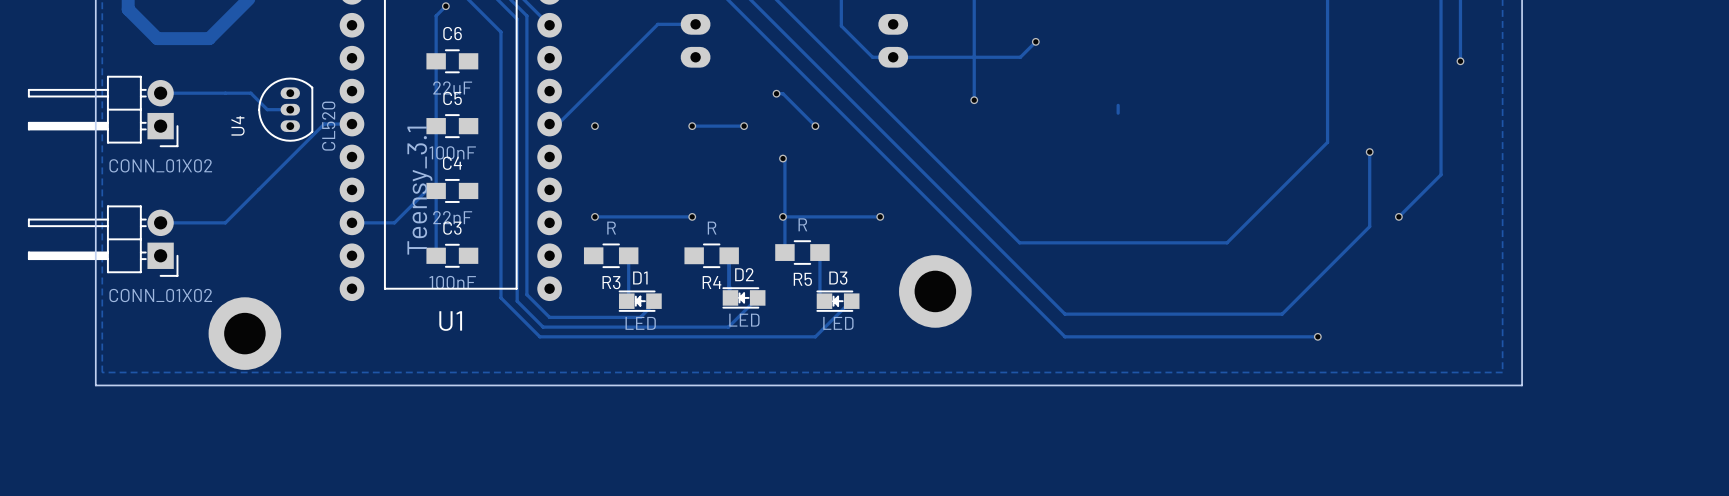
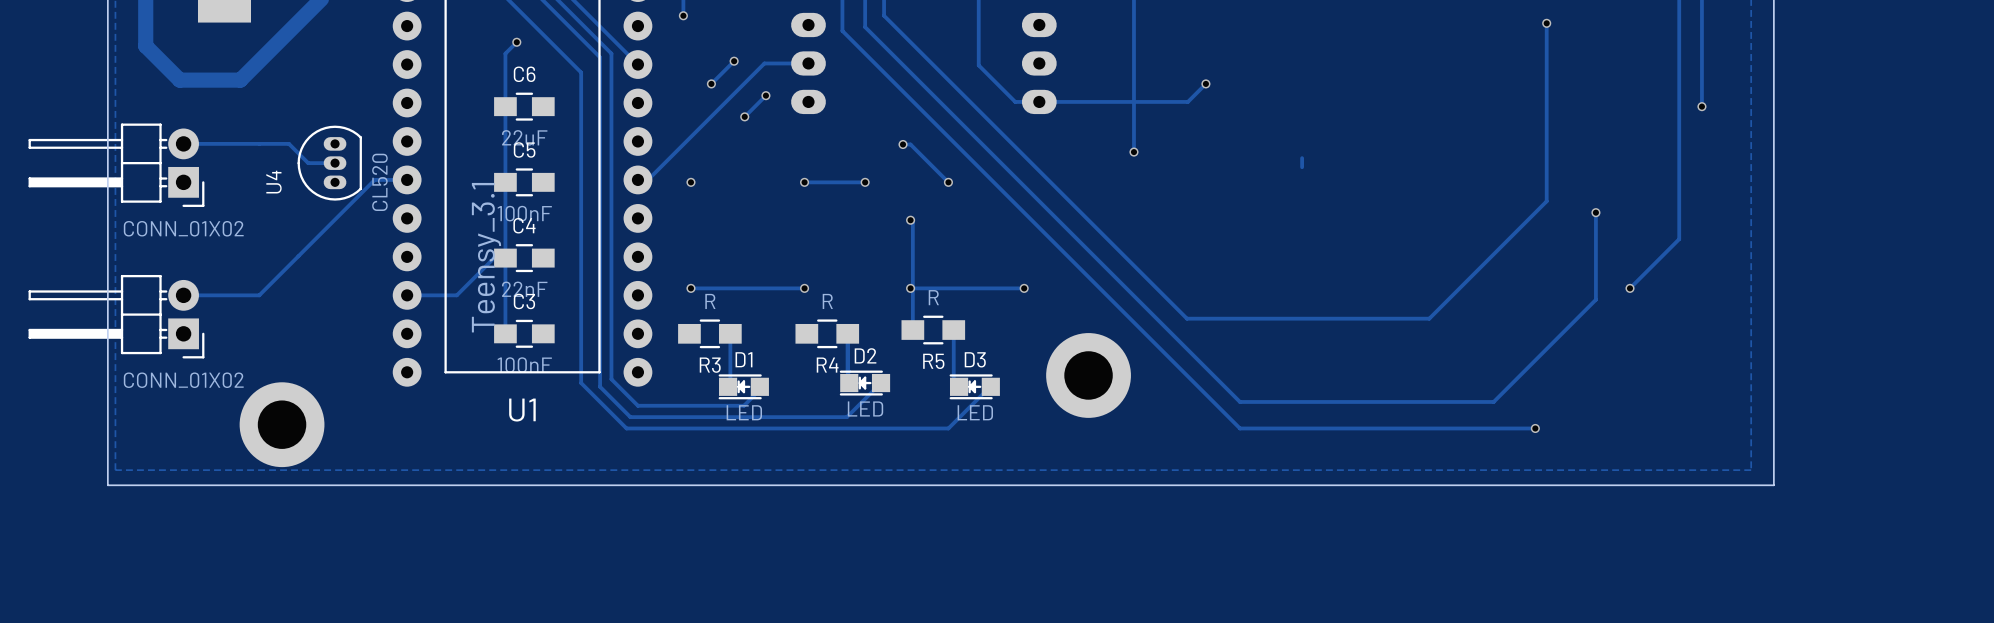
track: none -> (734, 61) (711, 83)
via: none -> (734, 61)
via: none -> (711, 83)
track: none -> (765, 95) (744, 116)
via: none -> (765, 95)
via: none -> (744, 116)

